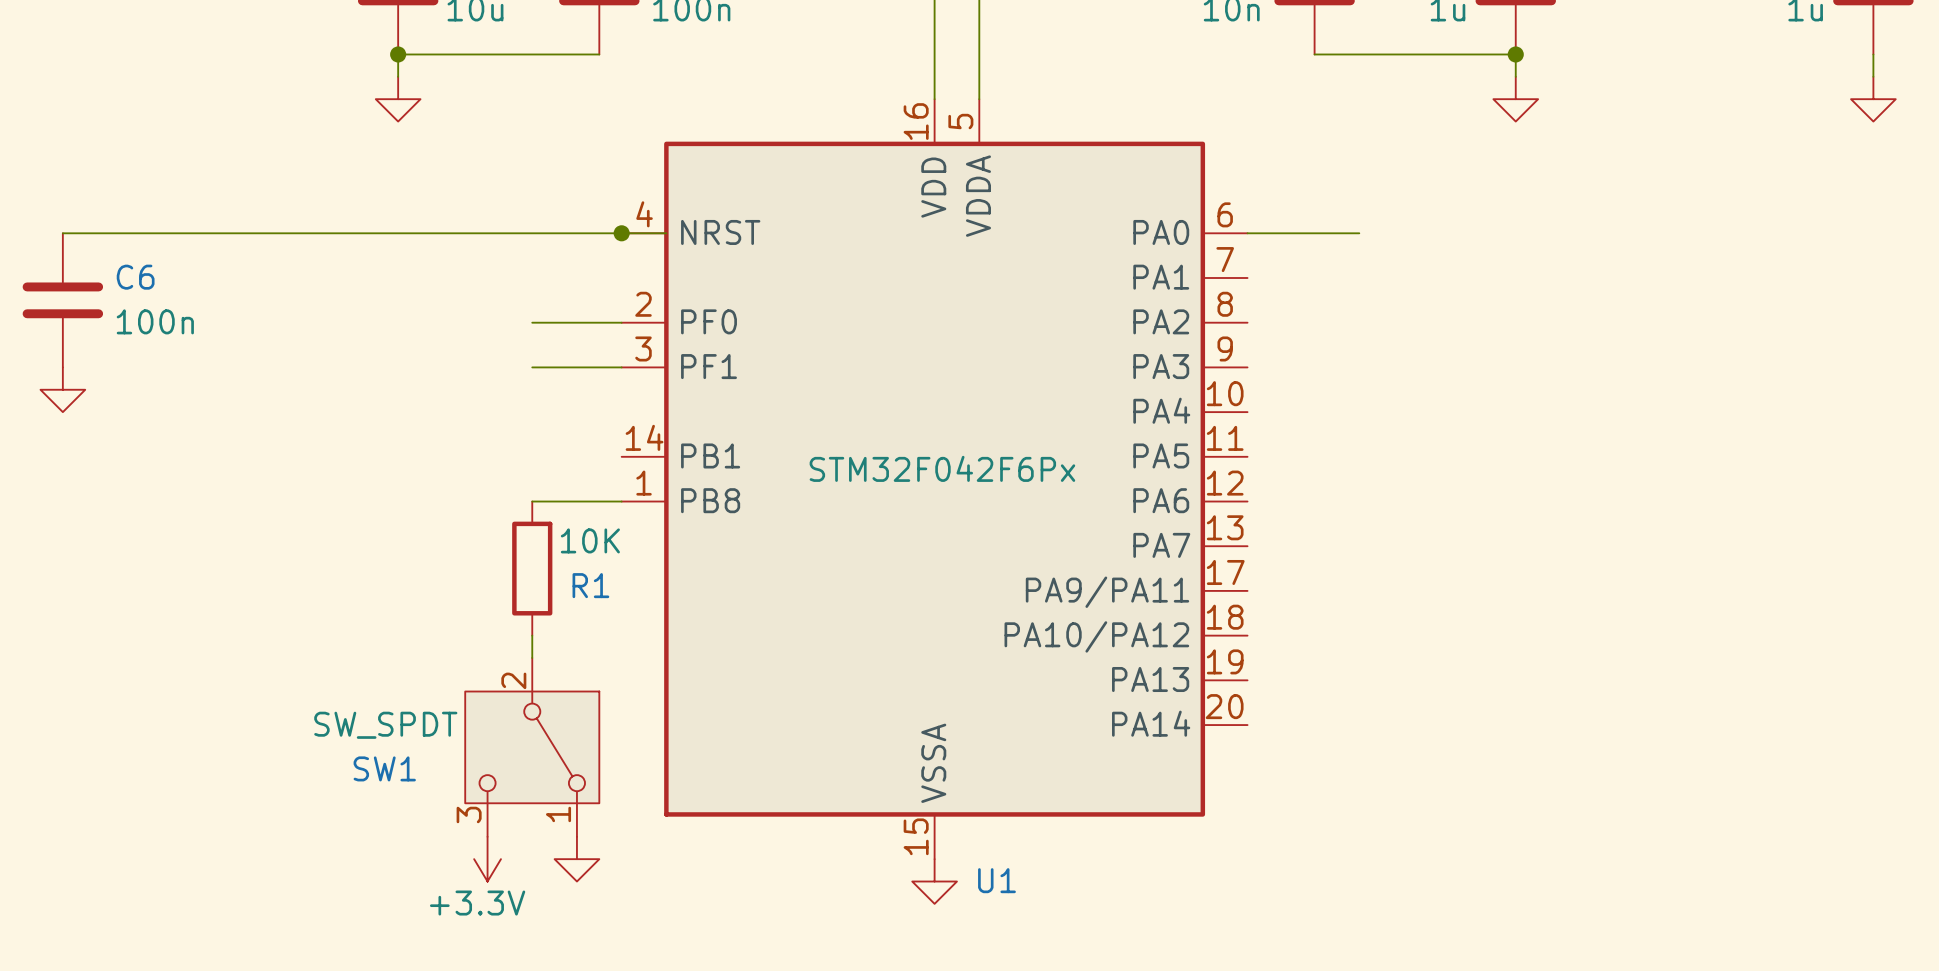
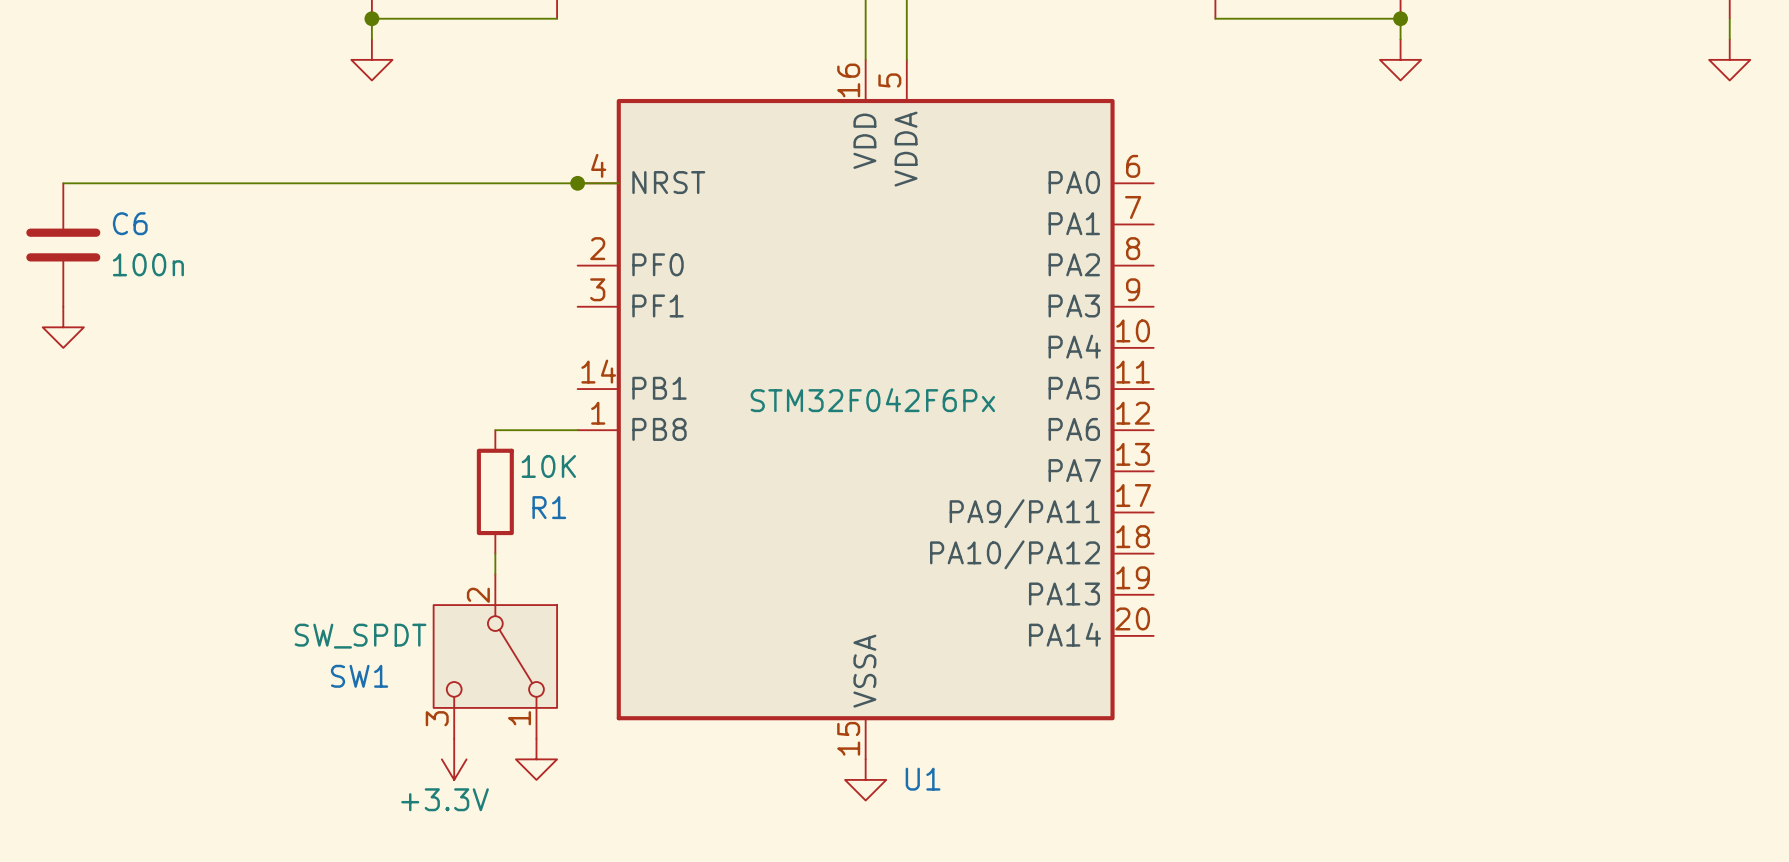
wire: (1247, 233) (1359, 233) -> none
wire: (532, 322) (621, 322) -> none
wire: (532, 367) (621, 367) -> none

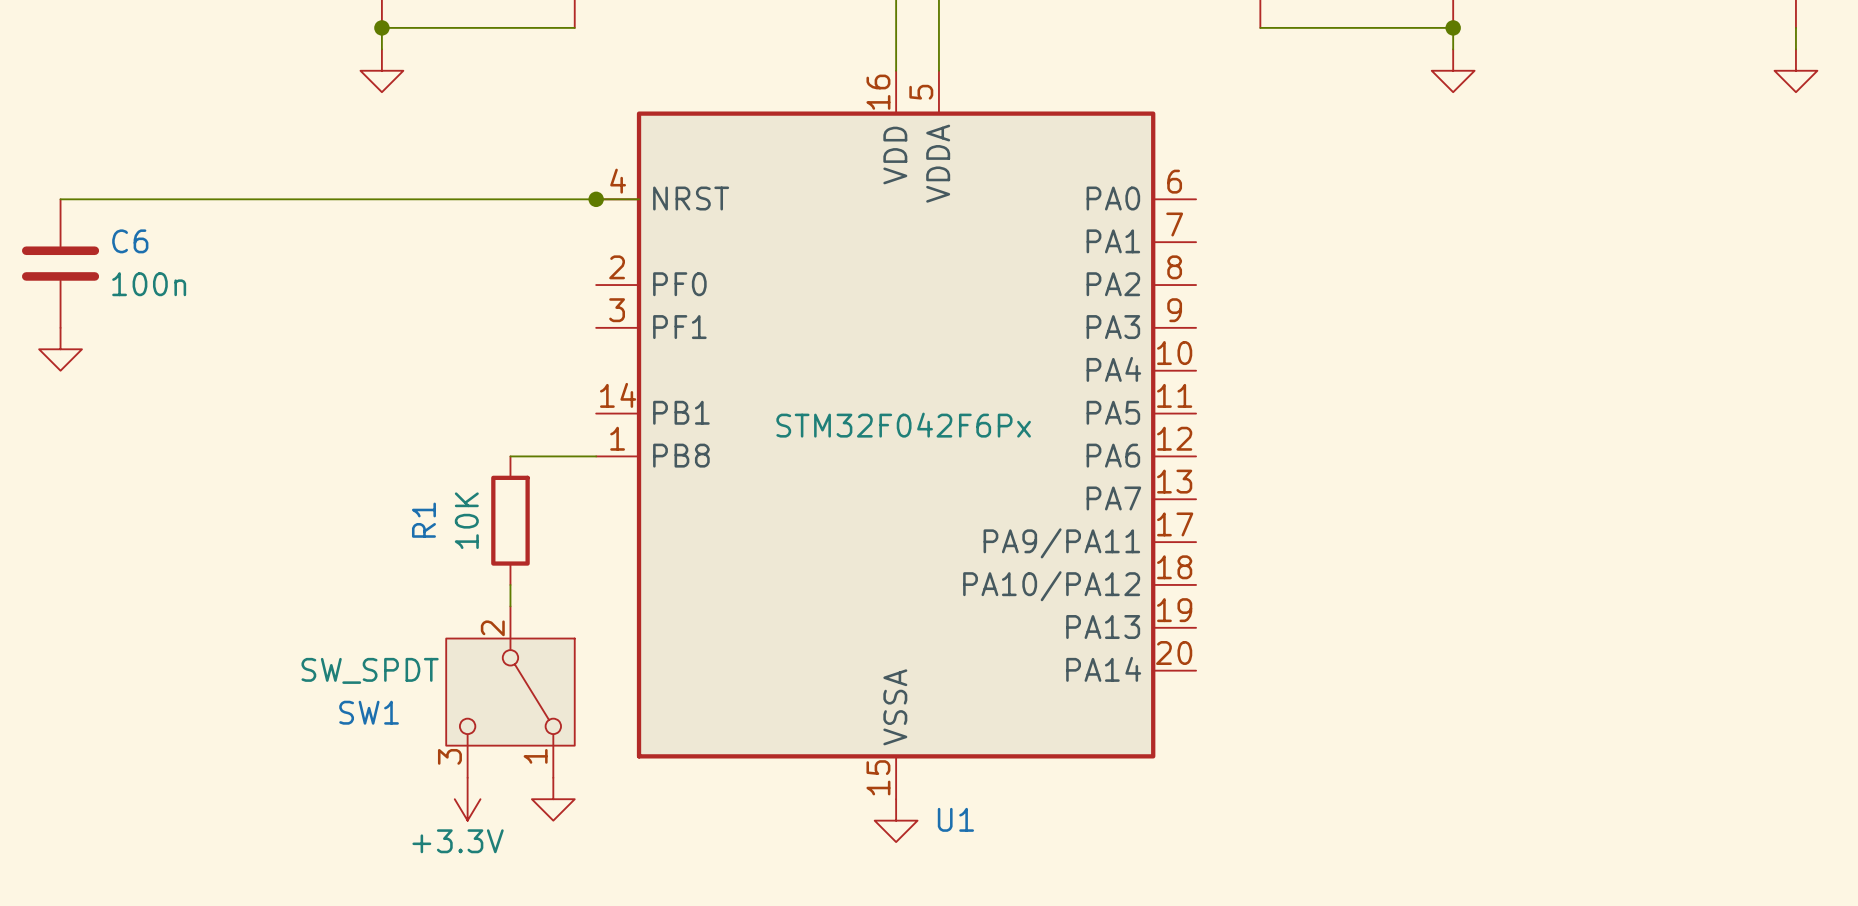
R1 value rotation: 0° (548, 466) -> 90° counterclockwise (466, 520)
R1 value position: 10K (548, 466) -> 10K (466, 520)
R1 name rotation: 0° (549, 507) -> 90° counterclockwise (423, 520)
R1 name position: R1 (549, 507) -> R1 (423, 520)

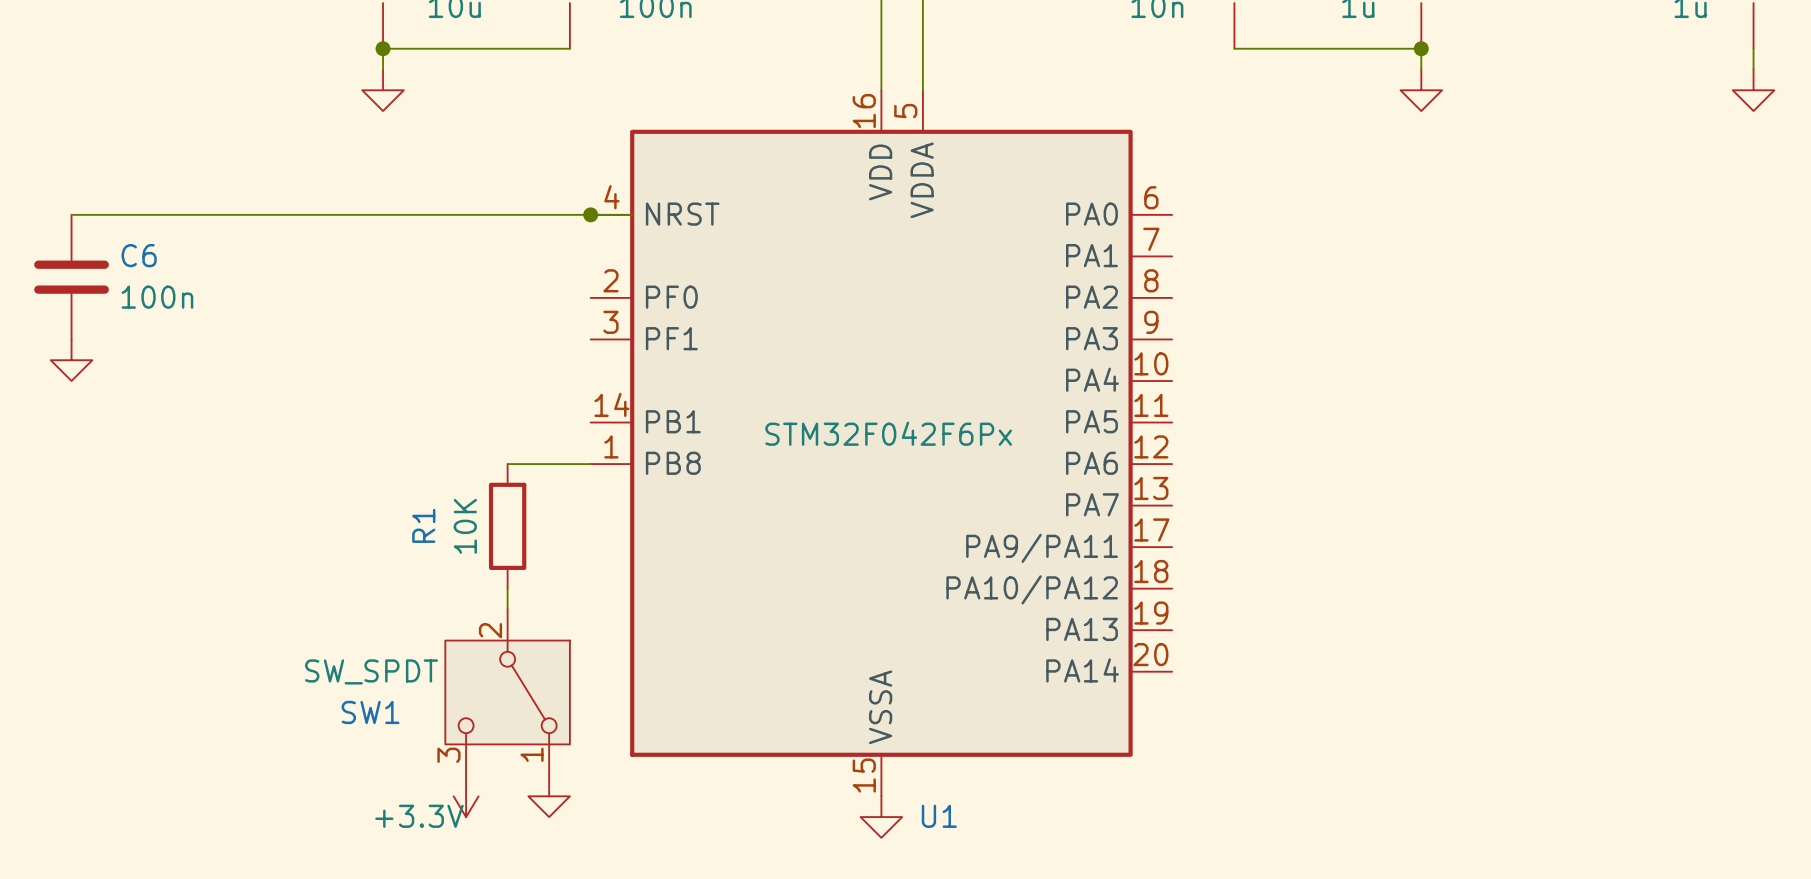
power symbol text position: +3.3V (458, 841) -> +3.3V (419, 816)

